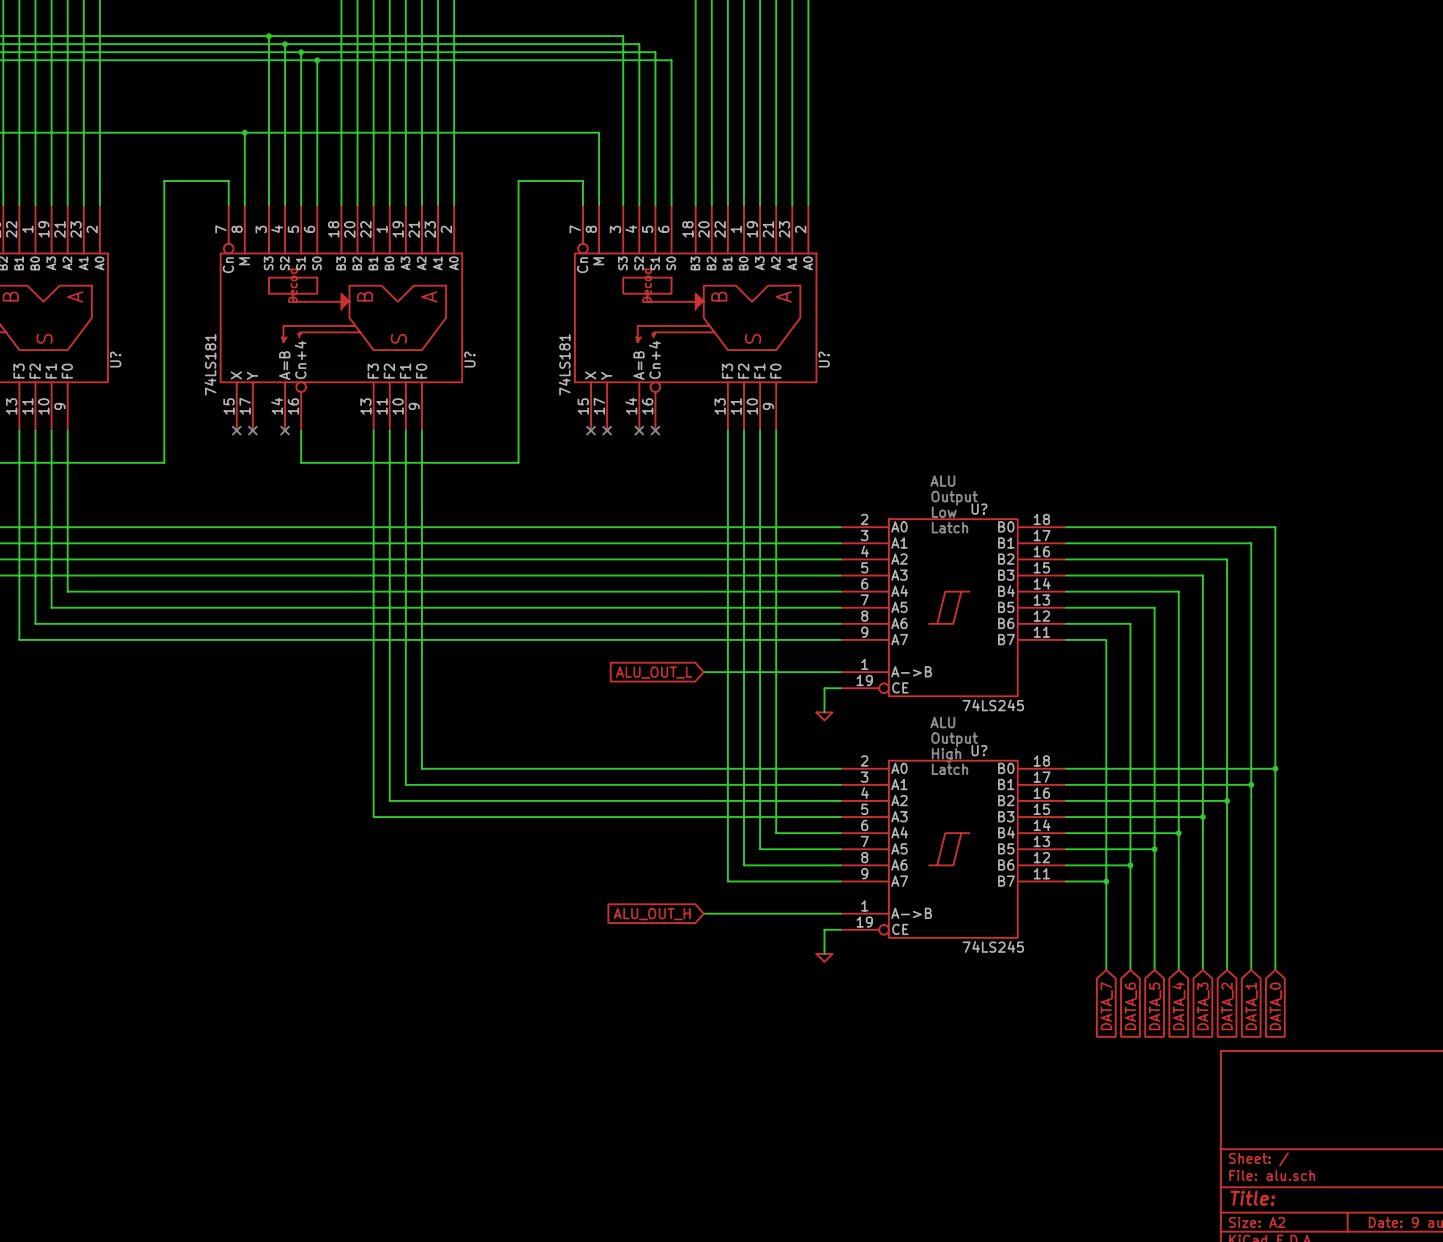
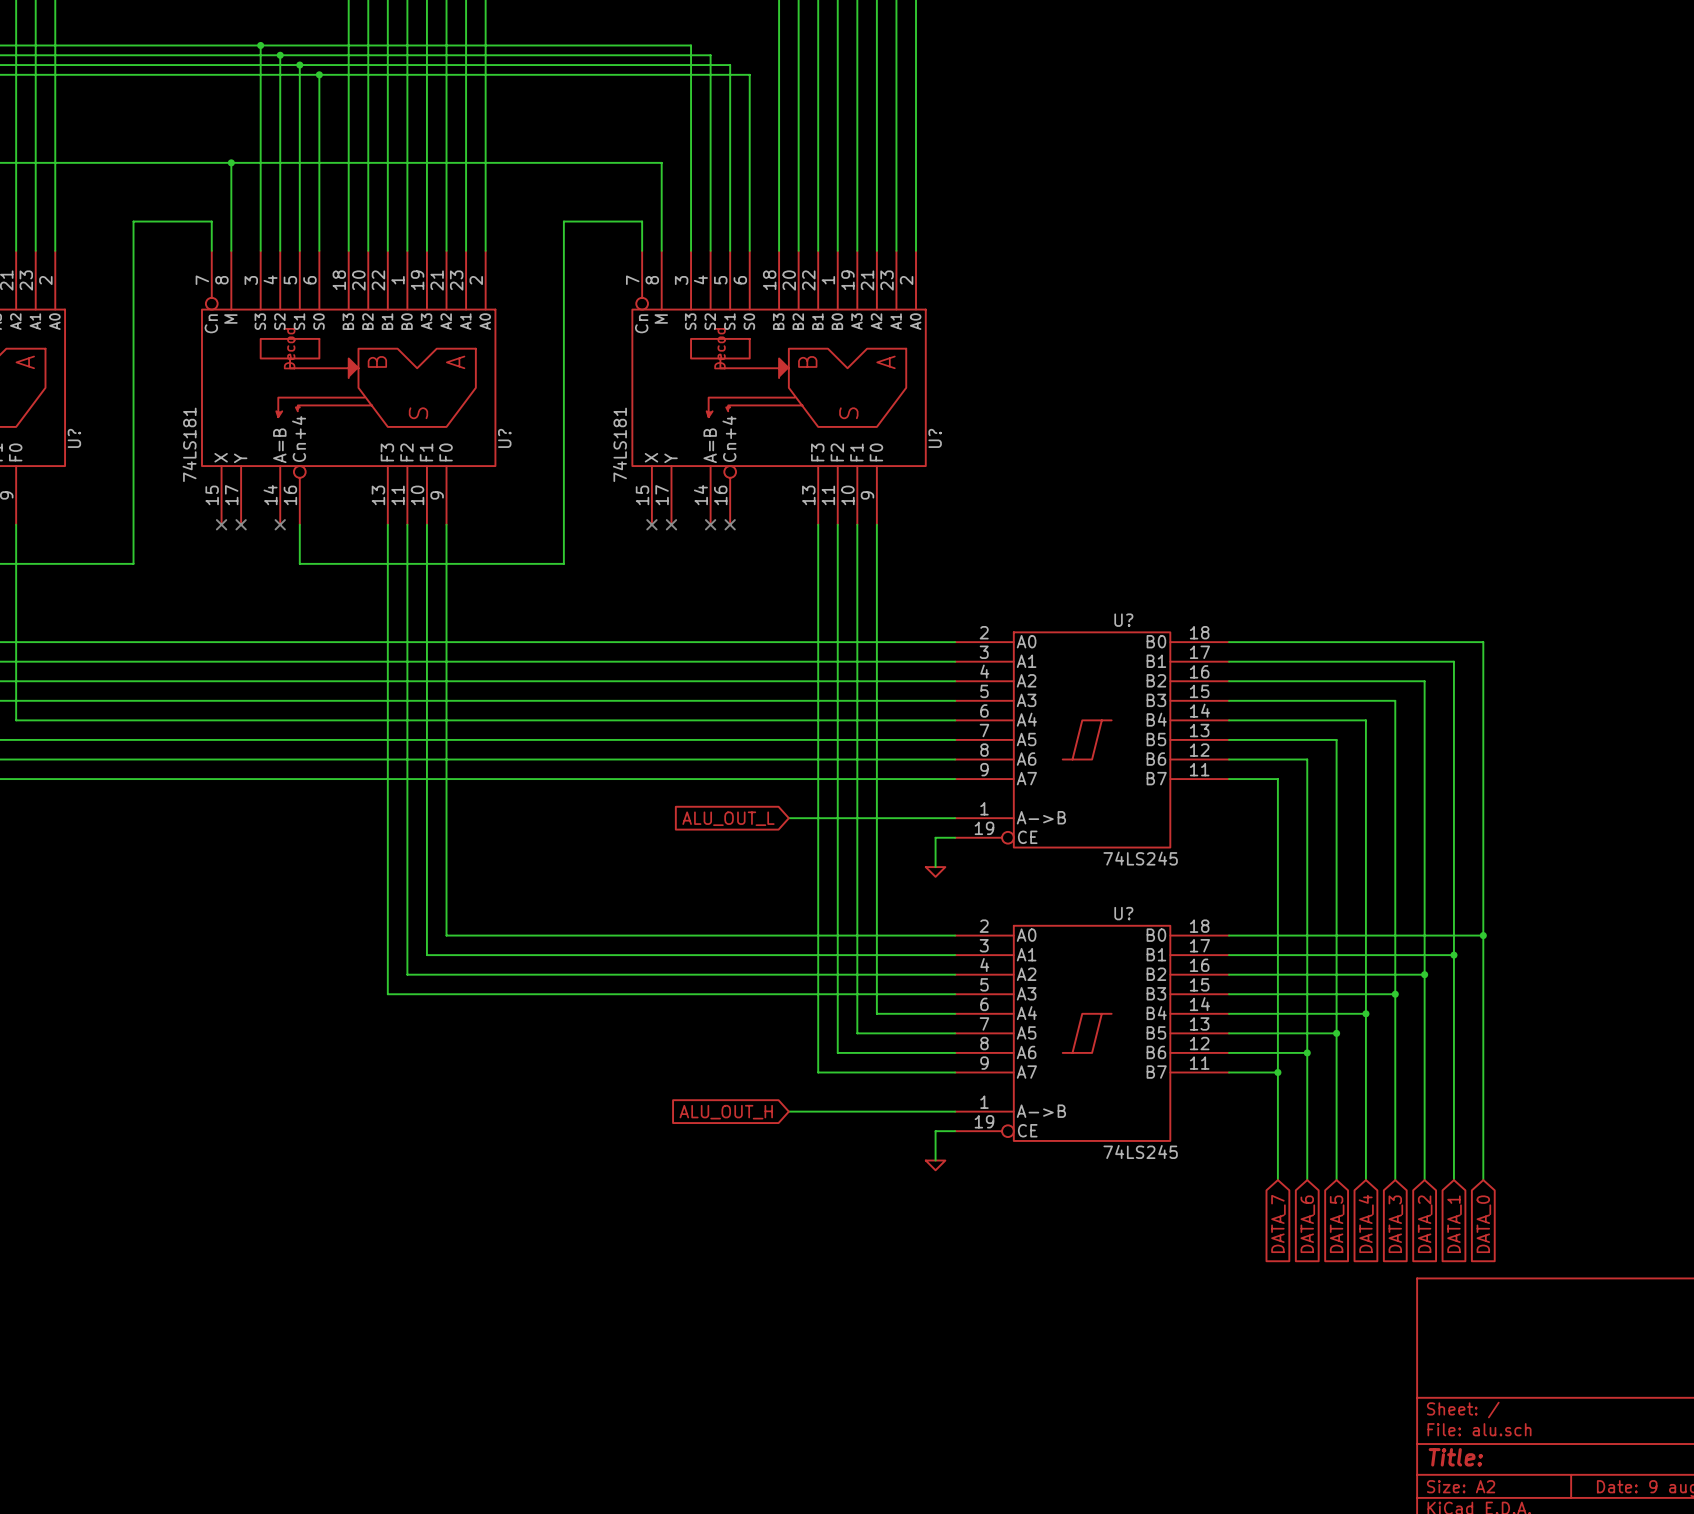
text: ALU (942, 481) -> none
text: Output (954, 498) -> none
text: Low (944, 512) -> none
text: Latch (949, 527) -> none
text: ALU (942, 722) -> none
text: Output (954, 739) -> none
text: High (946, 755) -> none
text: Latch (949, 769) -> none

